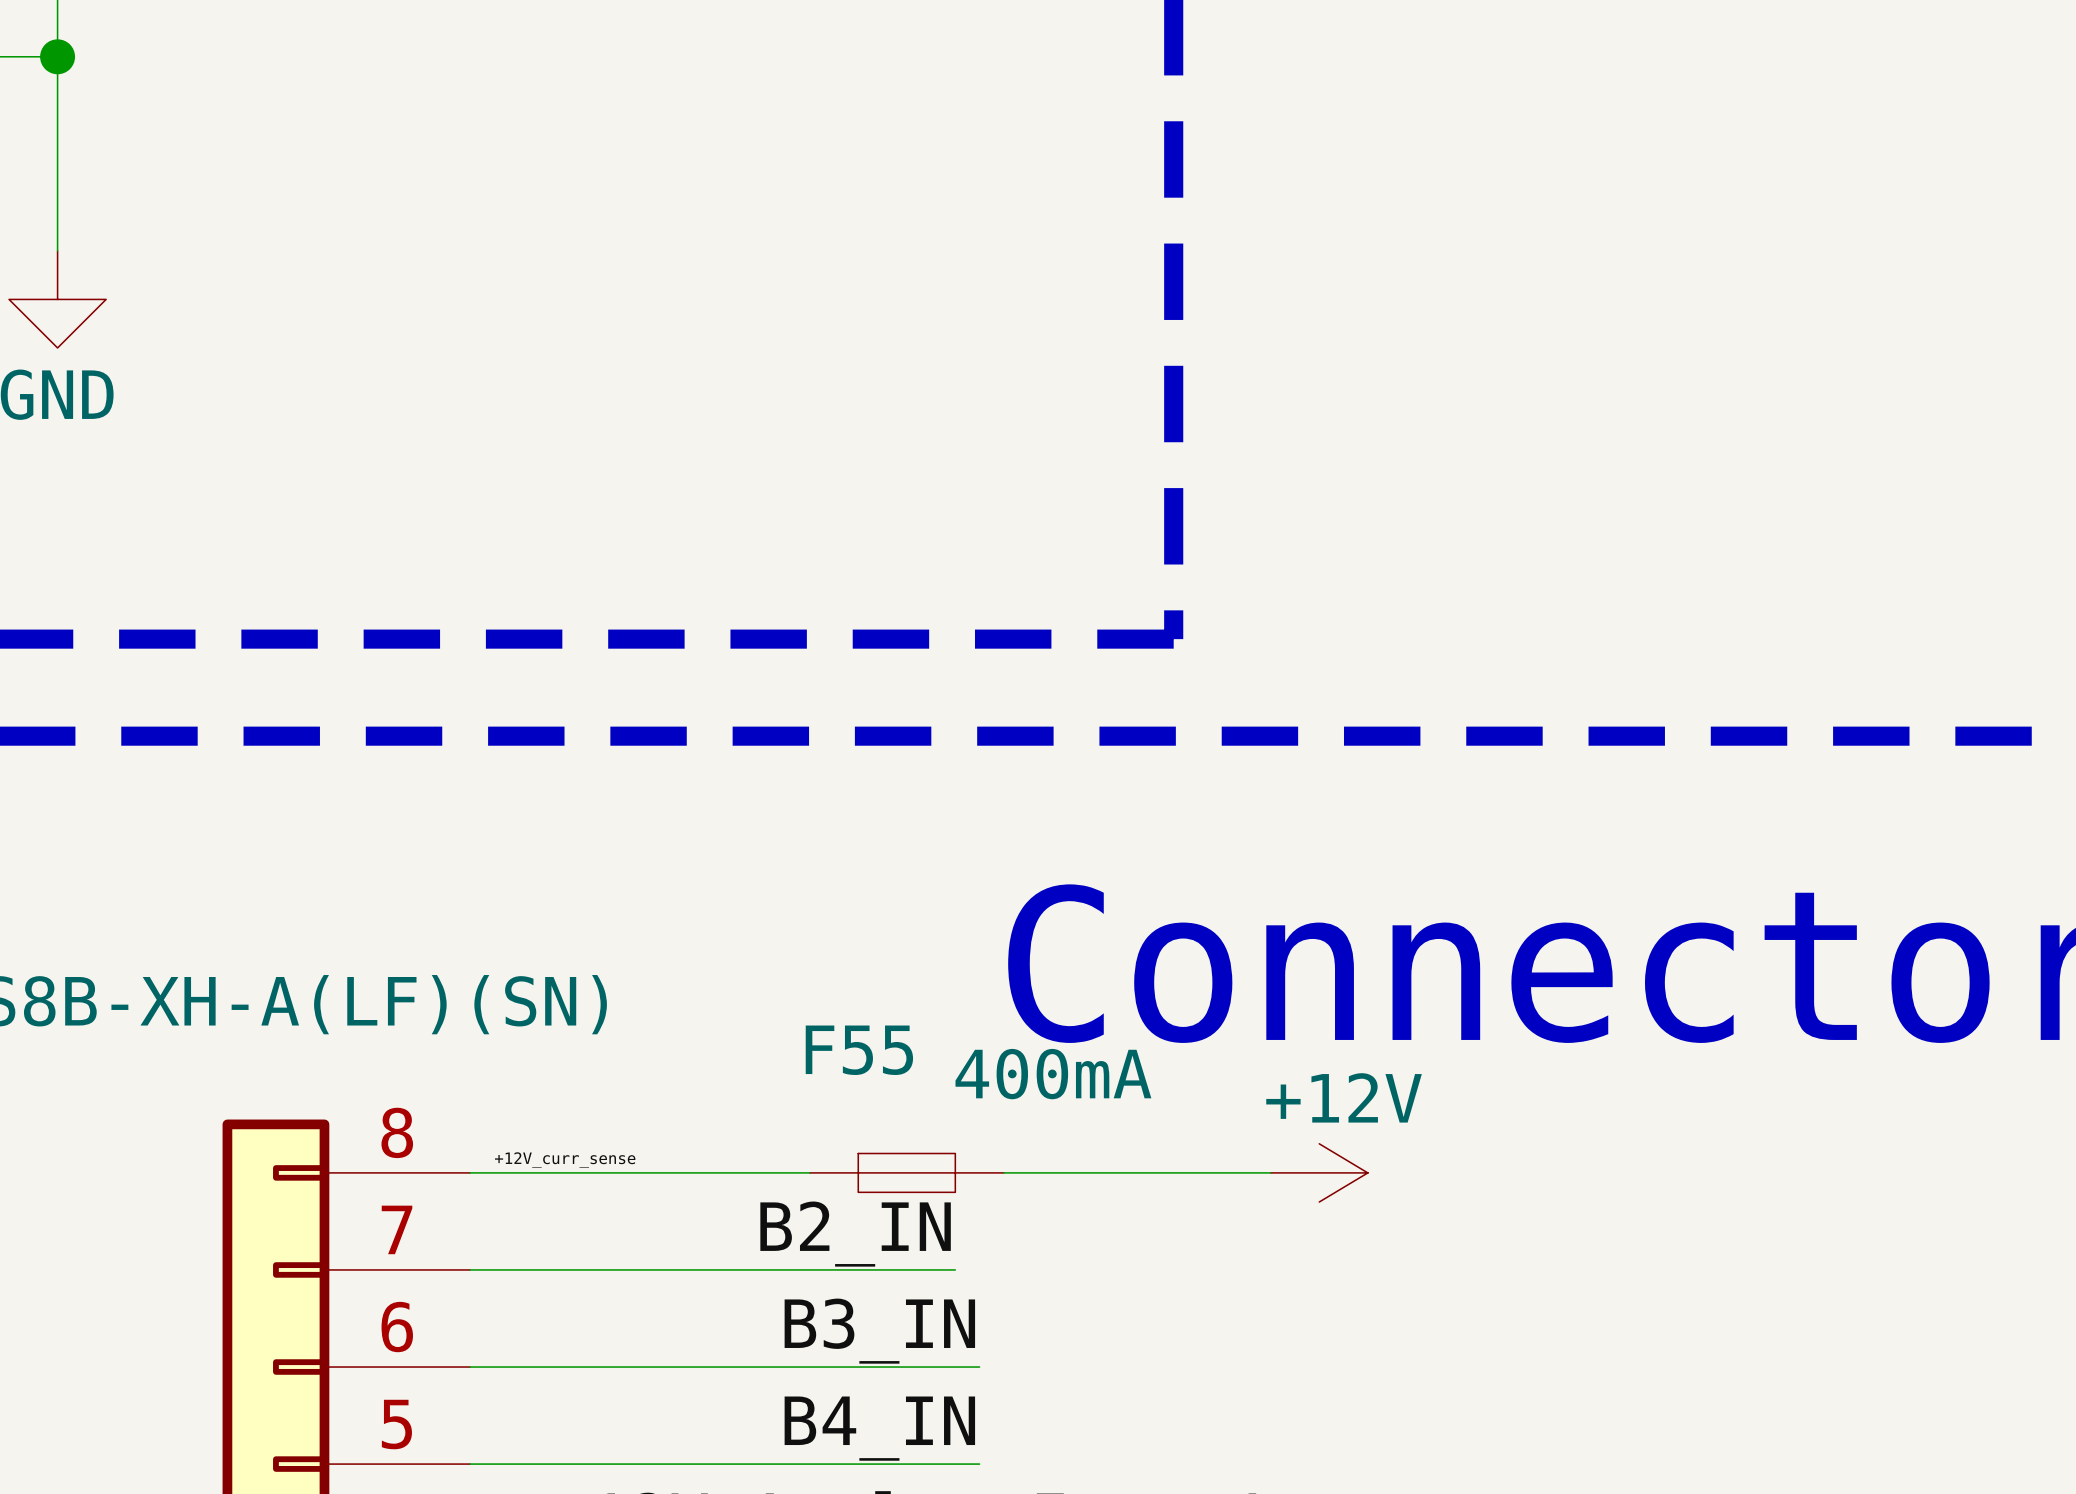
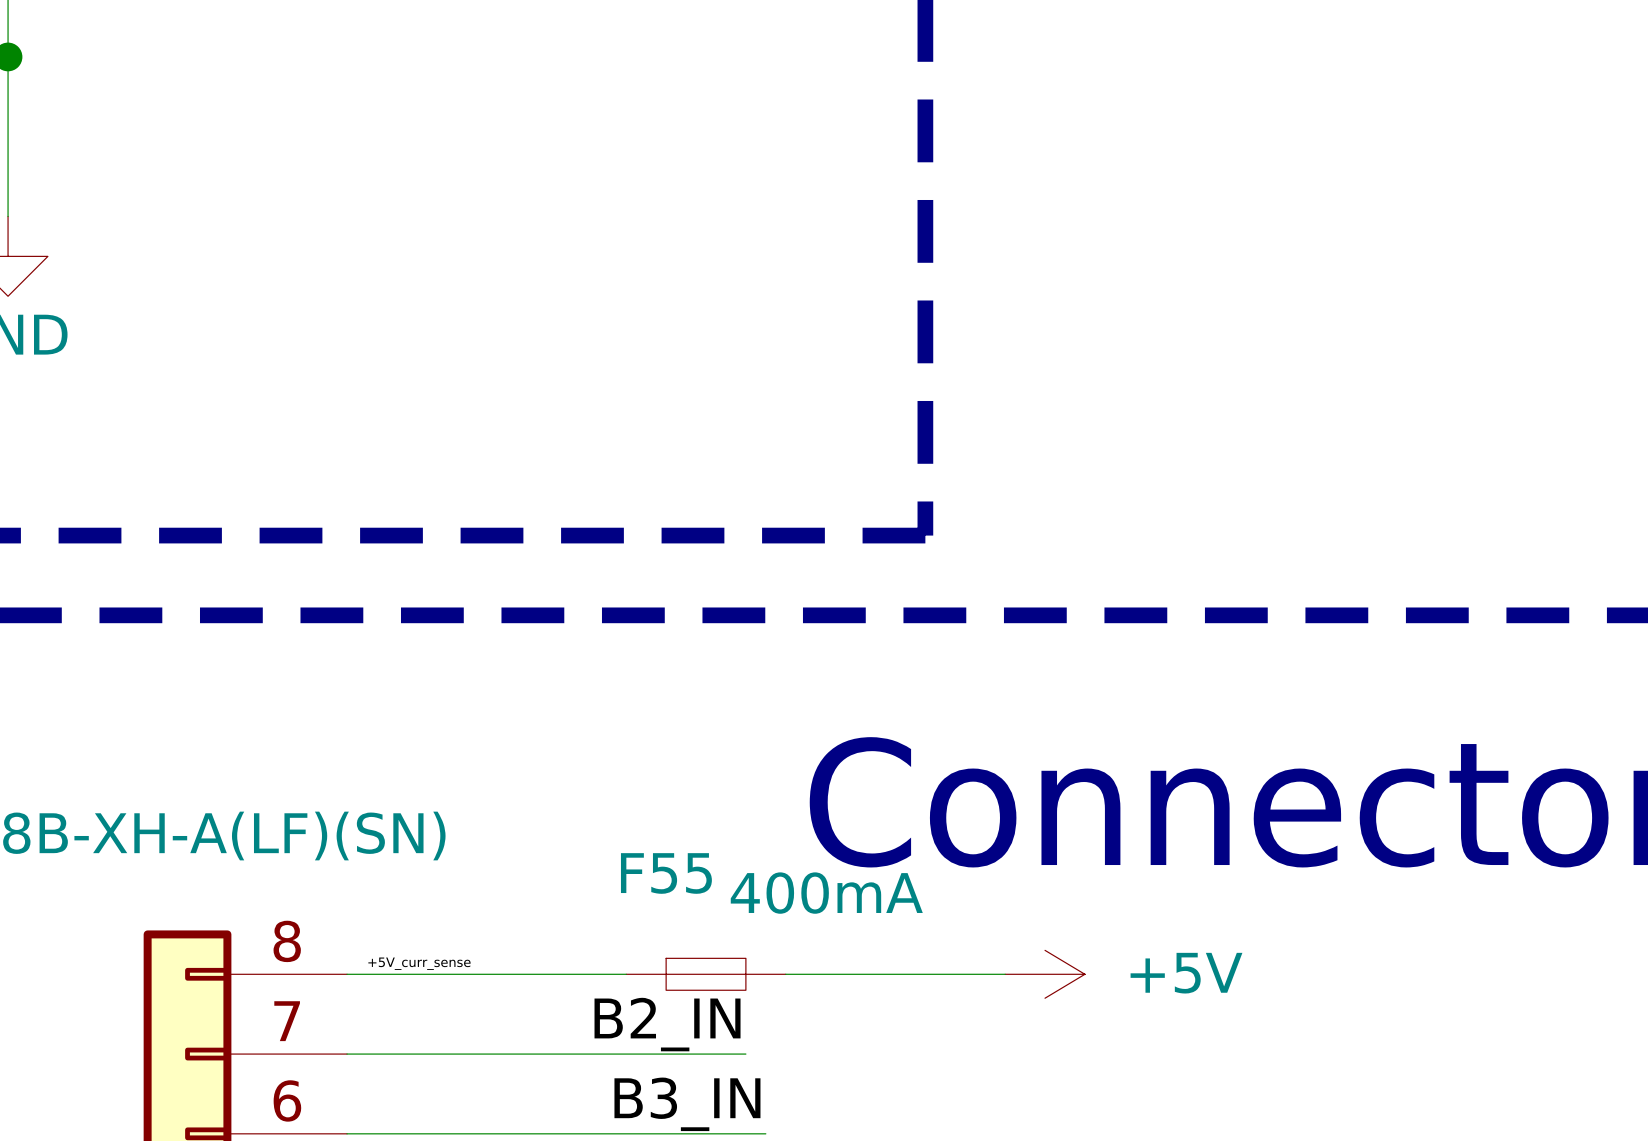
label: +12V_curr_sense (565, 1159) -> +5V_curr_sense (419, 963)
power symbol: +12V (1319, 1172) -> +5V (1045, 974)

